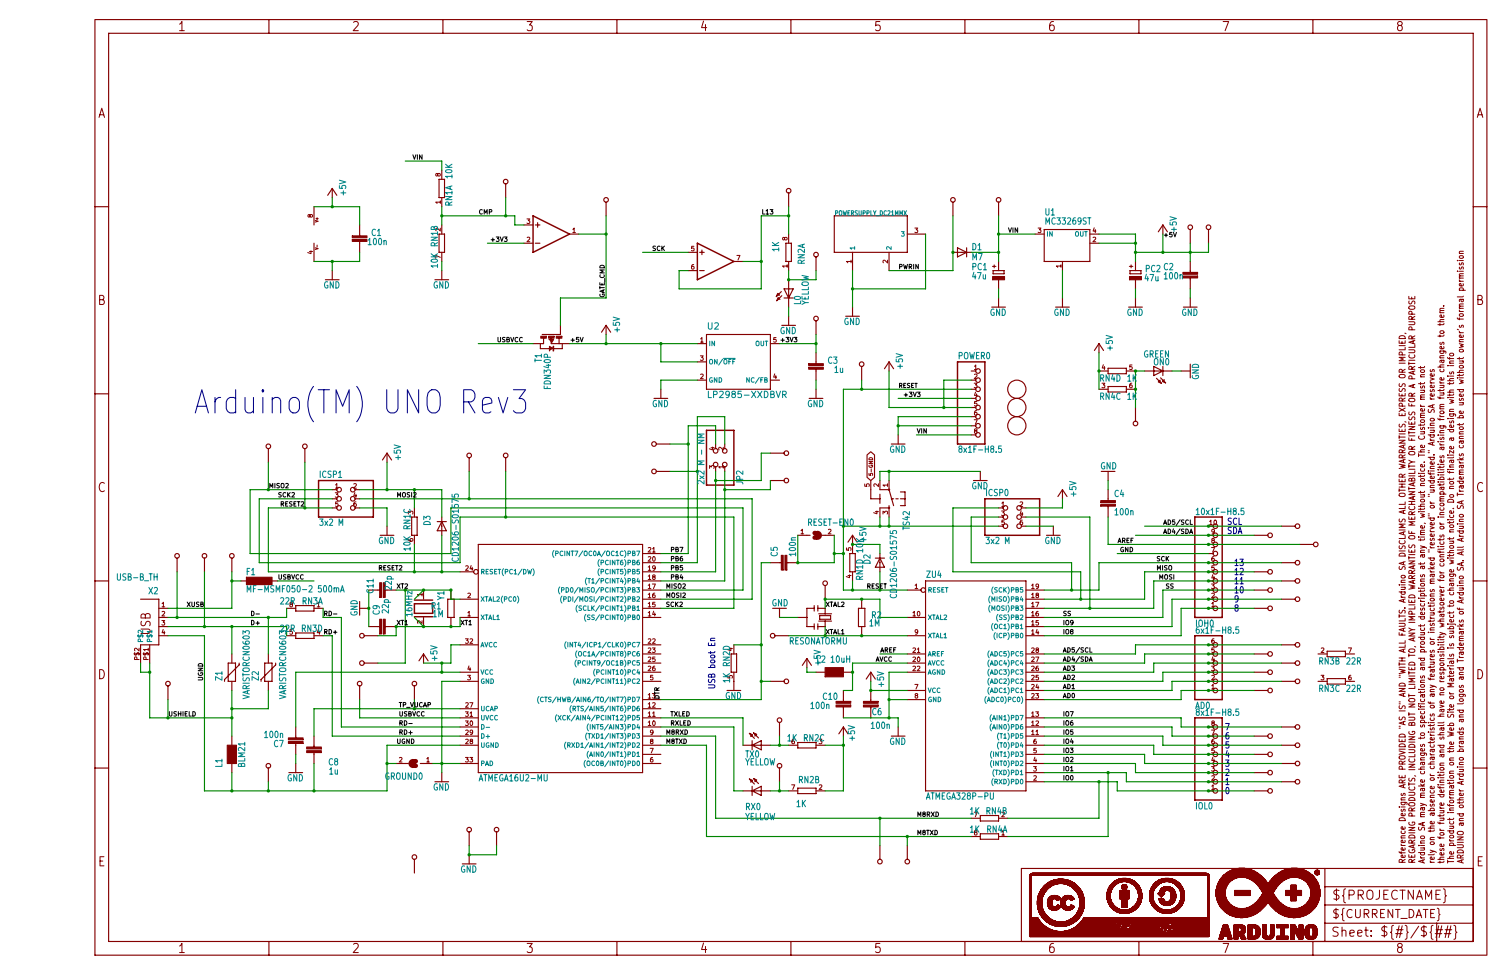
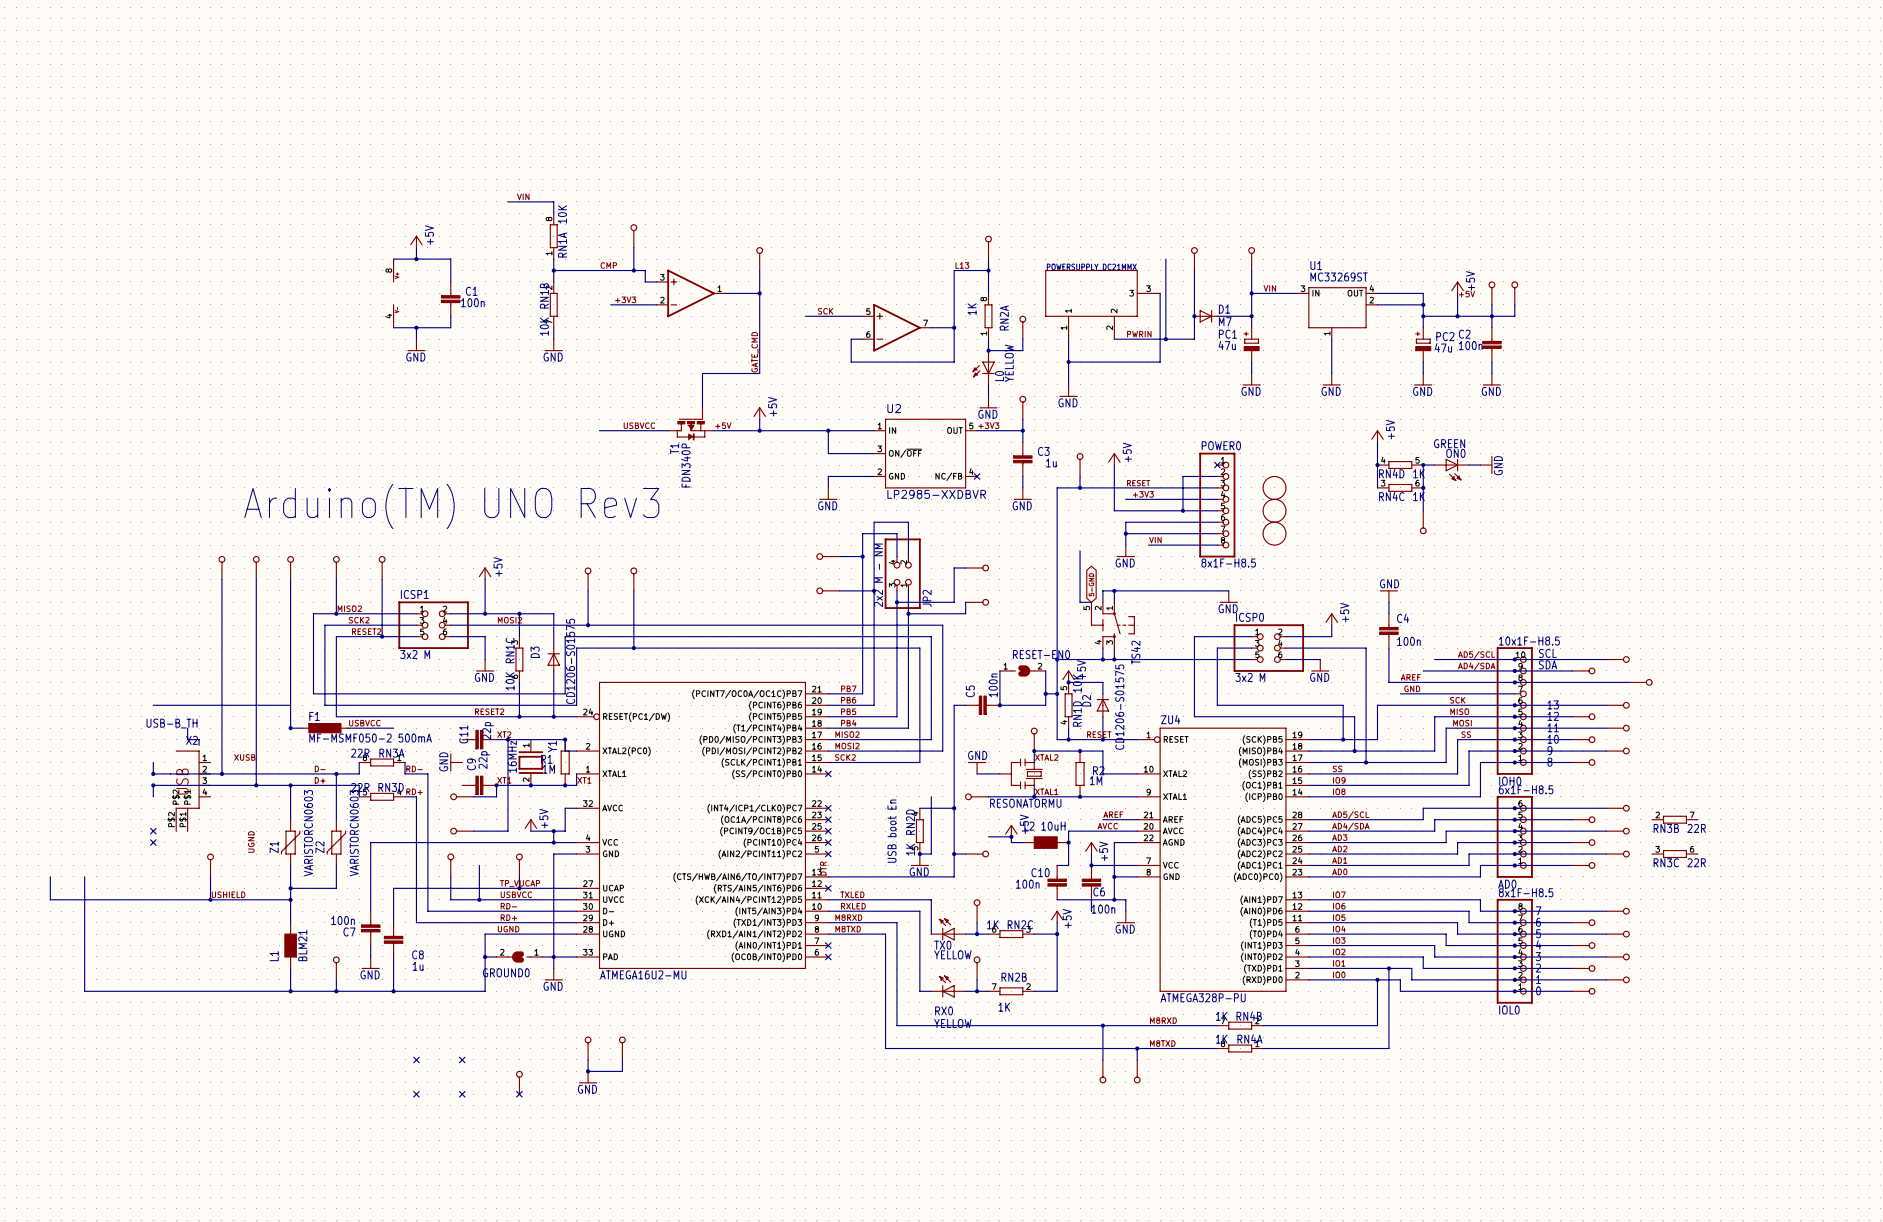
wire: none -> (1165, 259) (1165, 339)
junction: none -> (1165, 339)
no-connect mark: none -> (1217, 465)
no-connect mark: none -> (977, 476)
wire: none -> (1080, 550) (1080, 602) (1091, 602)
part: none -> (221, 568)
part: none -> (256, 568)
part: none -> (290, 568)
wire: none -> (221, 579) (221, 716)
wire: none -> (256, 579) (256, 716)
wire: none -> (290, 579) (290, 716)
part: (790, 487) -> none
wire: none -> (153, 705) (290, 705)
part: (177, 562) -> none
part: (204, 562) -> none
part: (231, 562) -> none
wire: none -> (187, 728) (187, 739) (199, 739) (199, 745)
wire: (231, 580) (231, 608) (167, 608) -> none
wire: (368, 590) (368, 626) -> none
wire: (423, 590) (414, 599) -> none
junction: (423, 590) -> none
wire: none -> (153, 762) (153, 773) (210, 773)
junction: (368, 608) -> none
junction: none -> (153, 773)
wire: (414, 617) (423, 626) -> none
no-connect mark: none -> (828, 773)
junction: none -> (153, 785)
wire: none -> (210, 785) (153, 785) (153, 796)
wire: (167, 635) (204, 635) (204, 790) -> (84, 876) (84, 991) (256, 991)
wire: none -> (931, 796) (931, 854) (919, 854)
no-connect mark: none -> (828, 808)
no-connect mark: none -> (828, 819)
no-connect mark: none -> (153, 831)
wire: (140, 663) (140, 672) (149, 672) -> none
wire: (149, 663) (149, 717) -> (50, 876) (50, 899) (187, 899)
no-connect mark: none -> (828, 831)
wire: none -> (988, 836) (1011, 836)
junction: none -> (1011, 836)
no-connect mark: none -> (153, 842)
junction: (149, 672) -> none
no-connect mark: none -> (828, 842)
no-connect mark: none -> (828, 854)
junction: none -> (919, 854)
wire: none -> (479, 865) (479, 899)
no-connect mark: none -> (828, 888)
junction: none -> (479, 899)
wire: none -> (1091, 899) (1091, 911)
no-connect mark: none -> (828, 945)
no-connect mark: none -> (828, 956)
no-connect mark: none -> (416, 1059)
no-connect mark: none -> (462, 1059)
no-connect mark: none -> (416, 1094)
no-connect mark: none -> (462, 1094)
no-connect mark: none -> (519, 1094)

